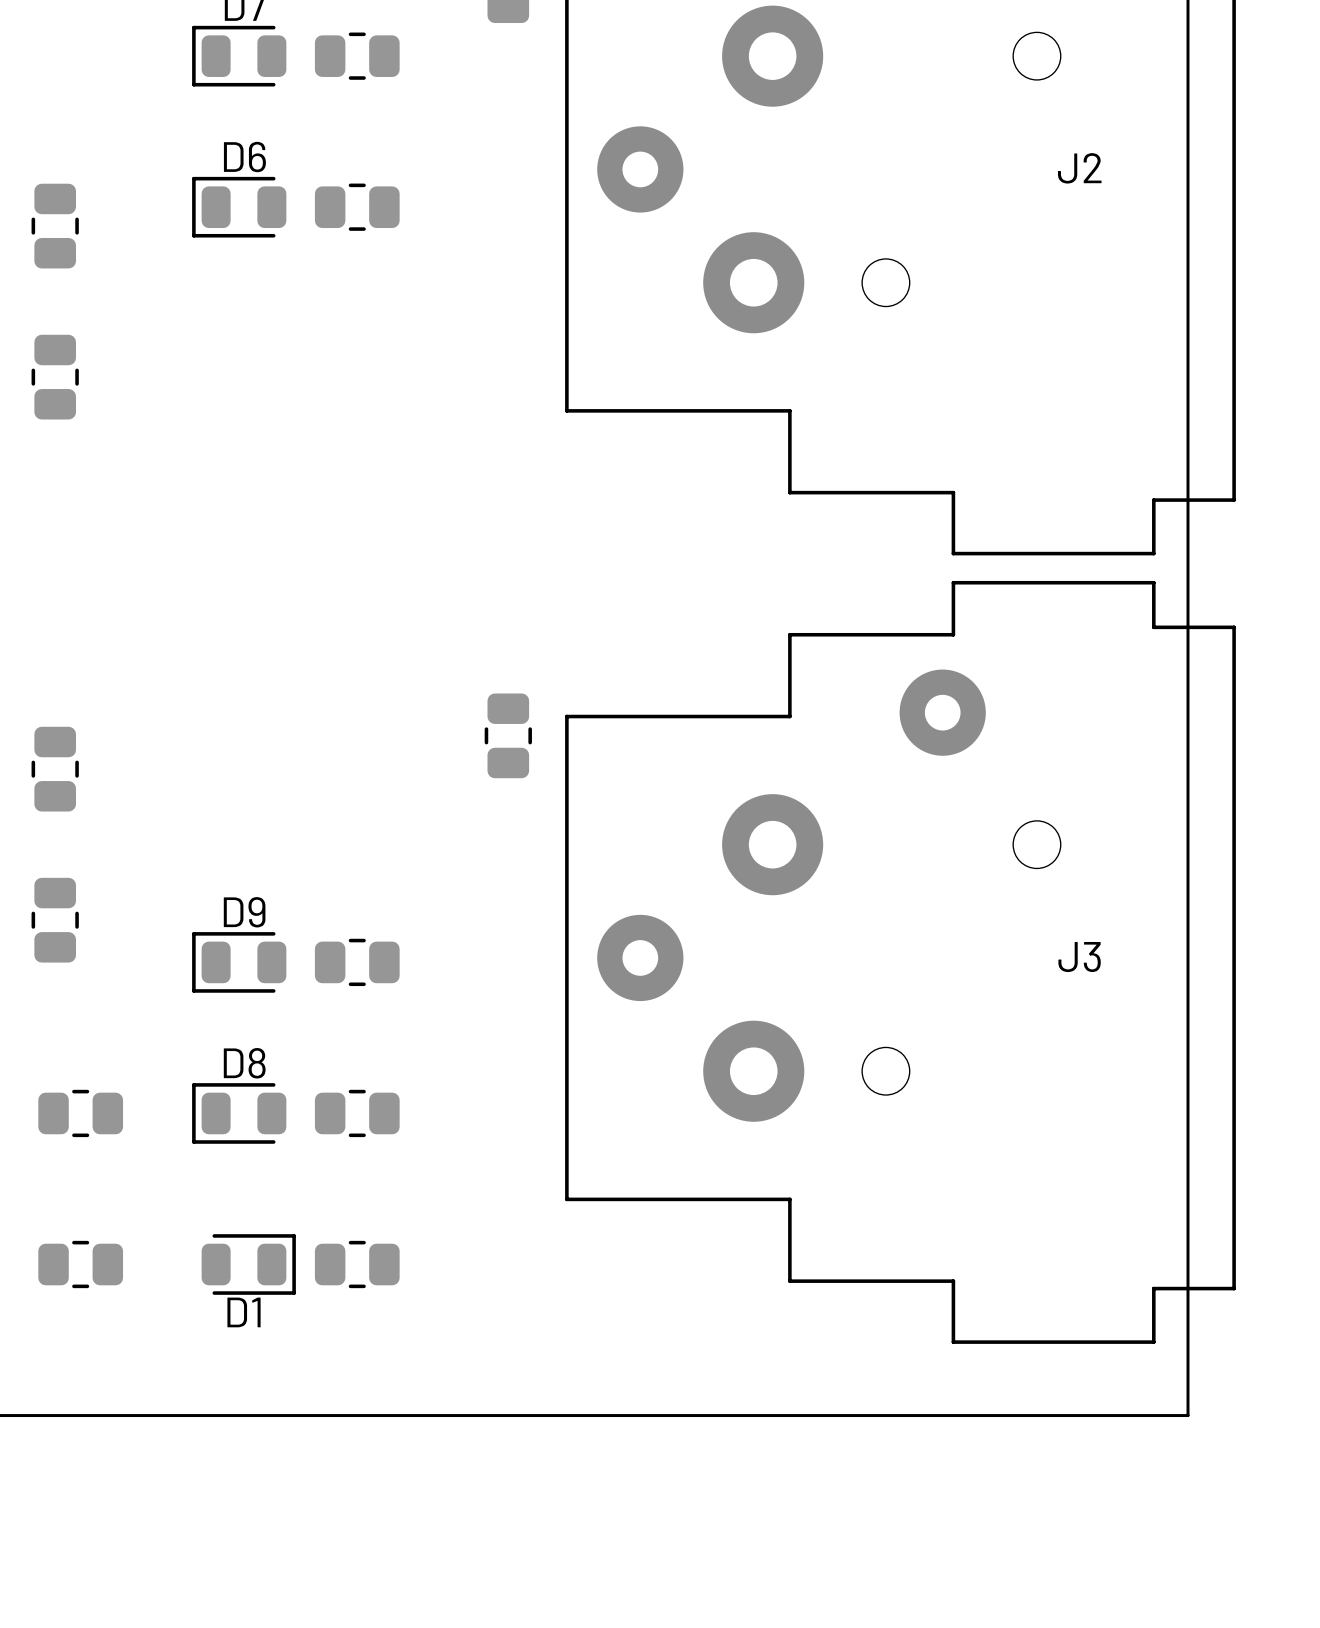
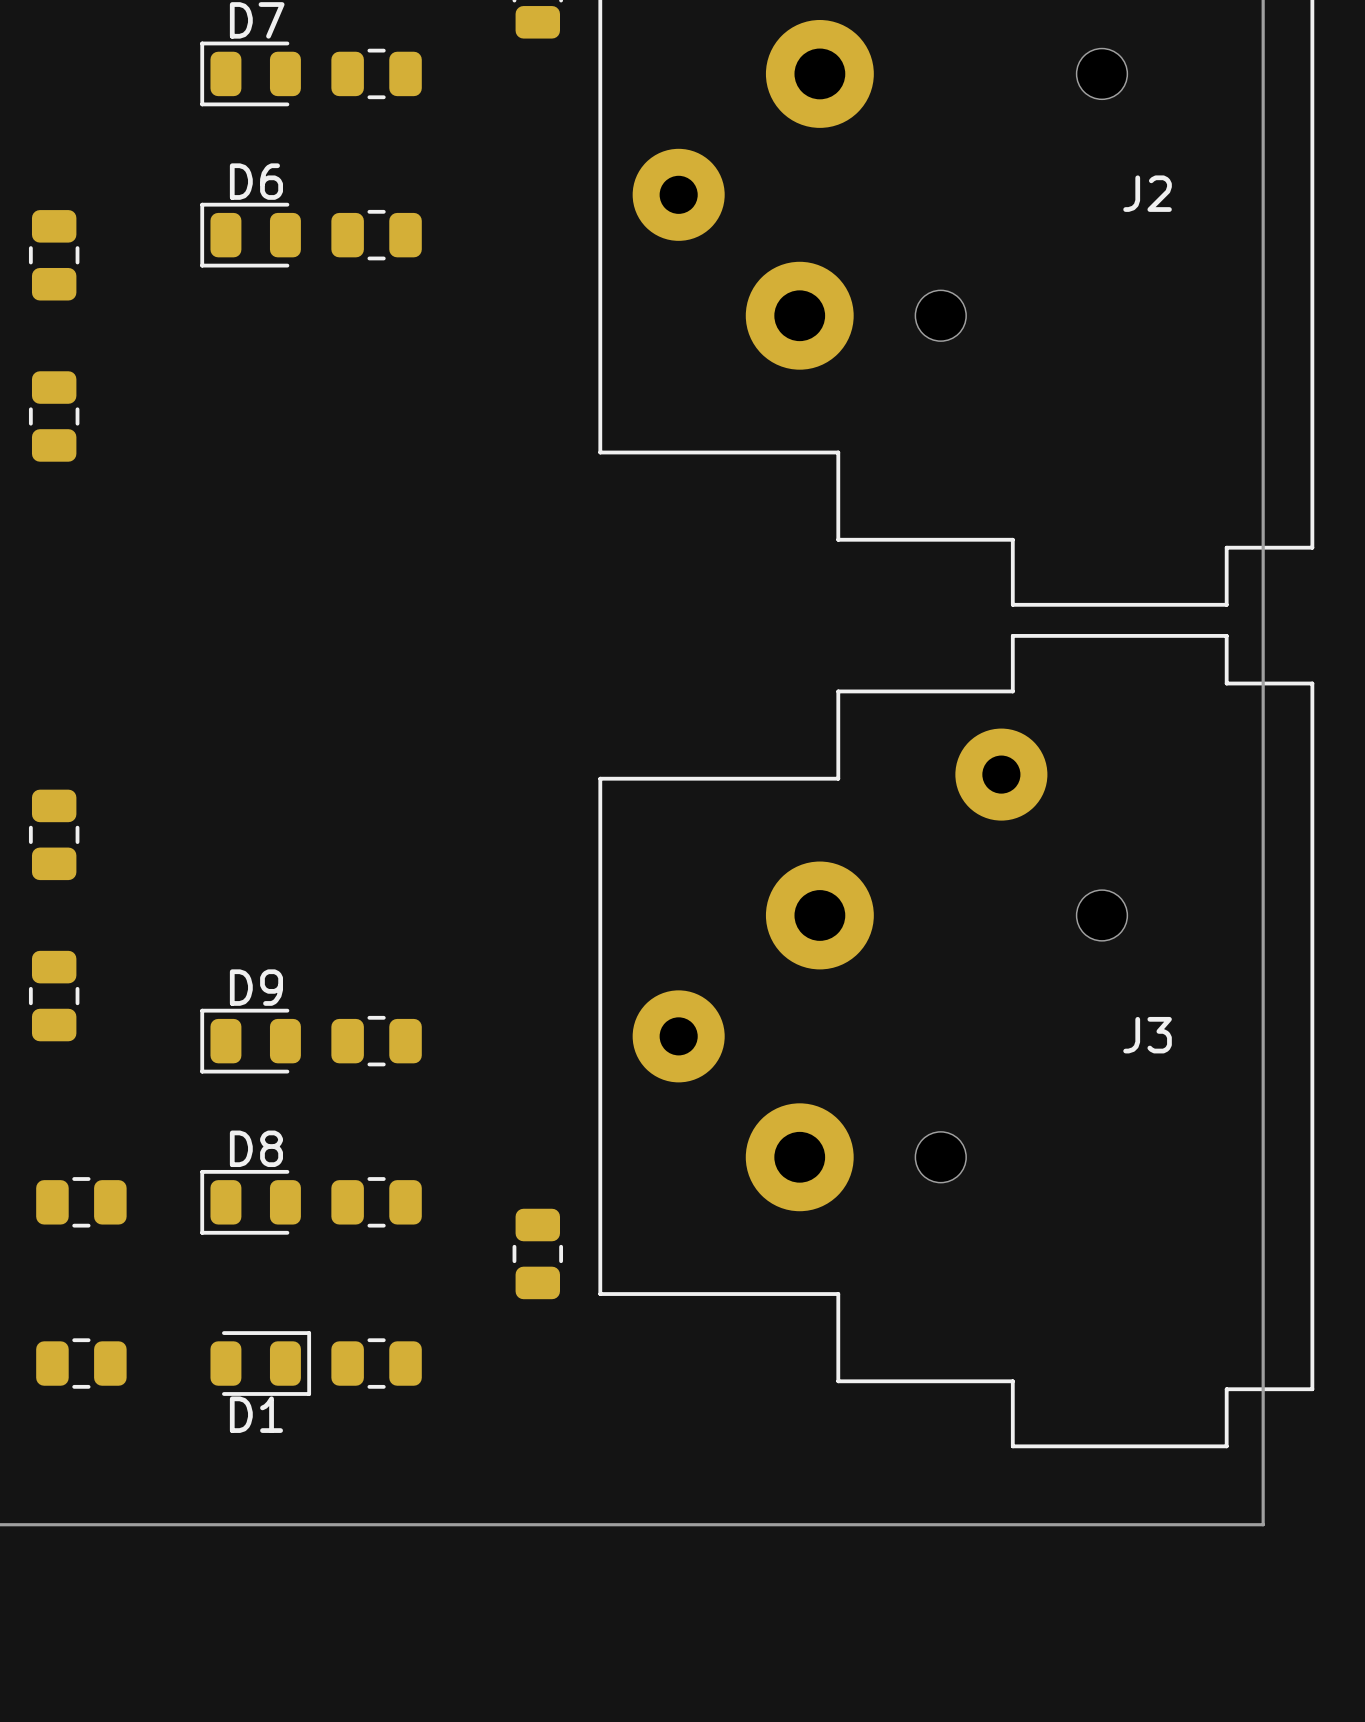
part position: (508, 735) -> (537, 1253)

